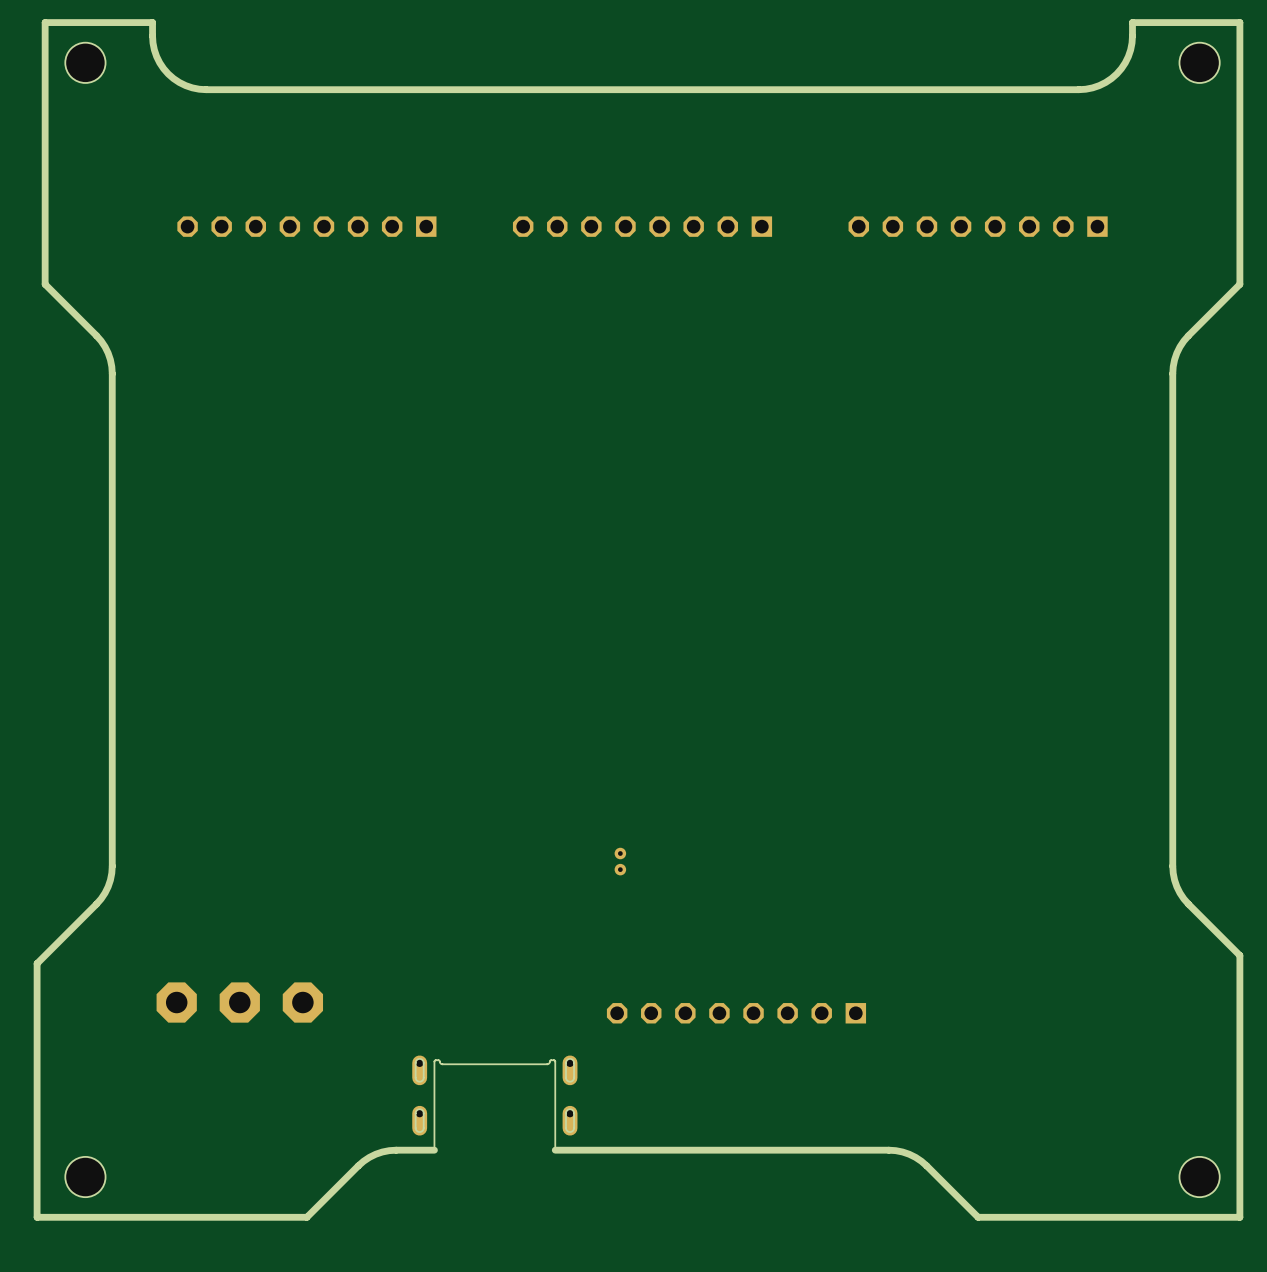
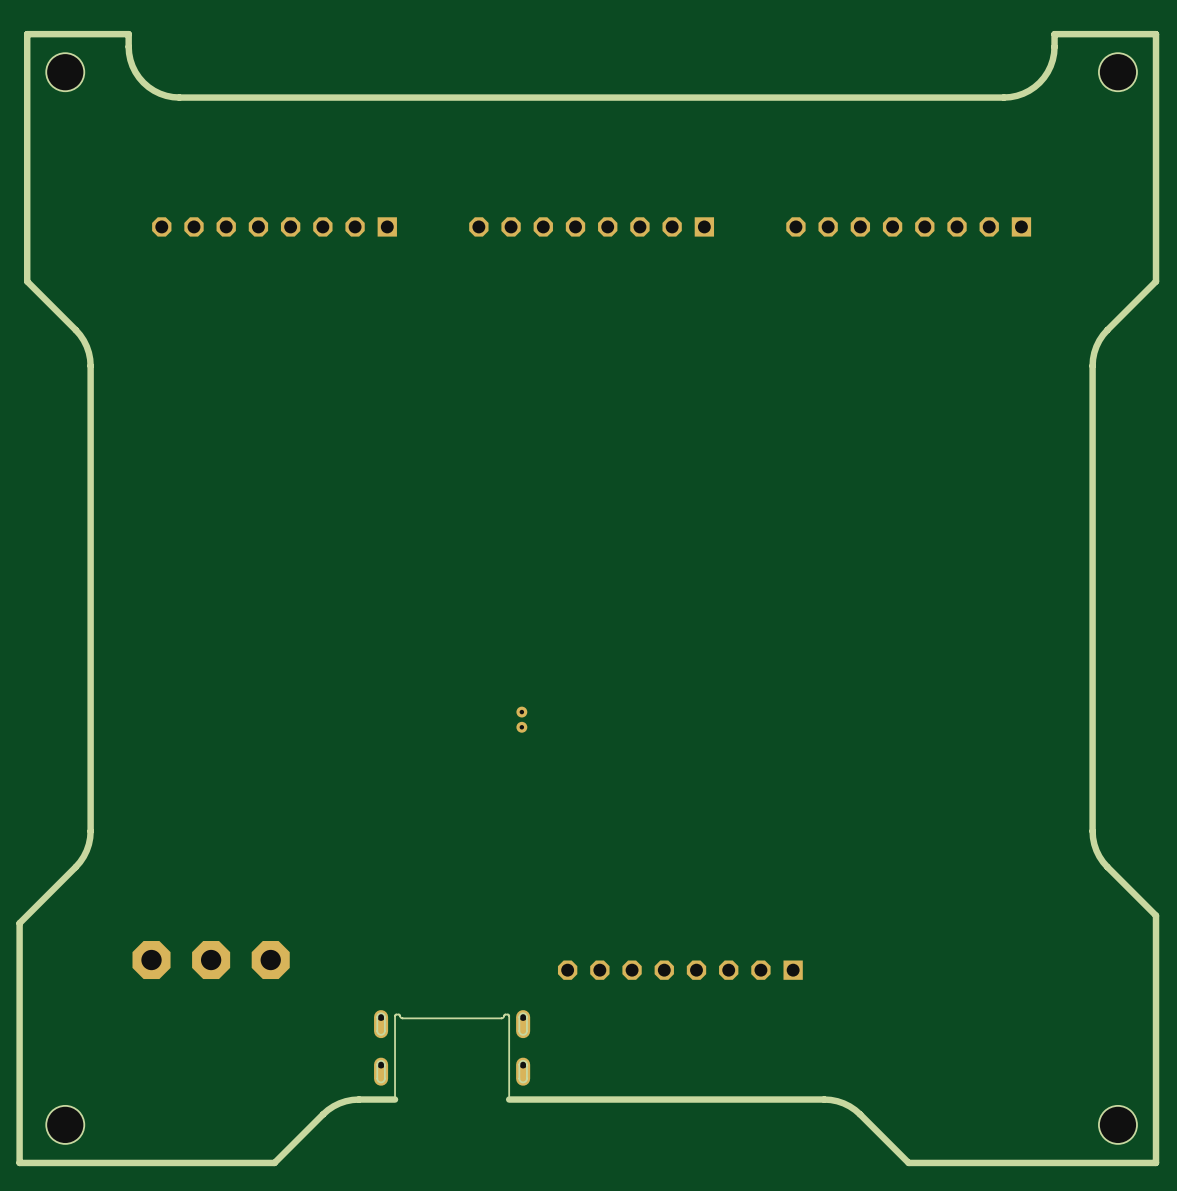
part position: (620, 861) -> (521, 719)

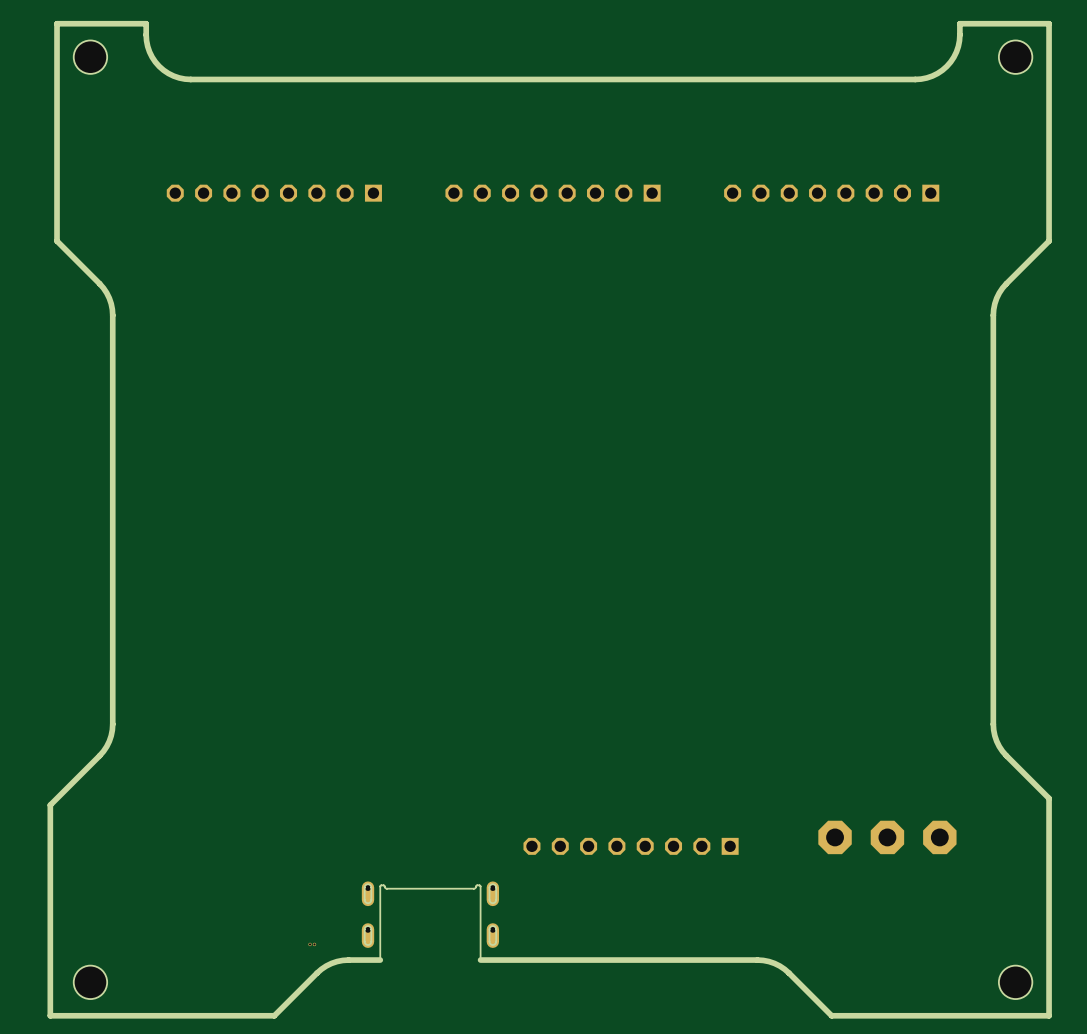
part: (521, 719) -> none
part: (211, 960) -> none
part: none -> (887, 837)
part: none -> (312, 944)

